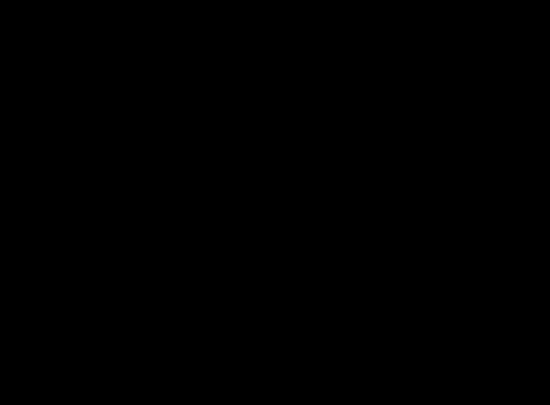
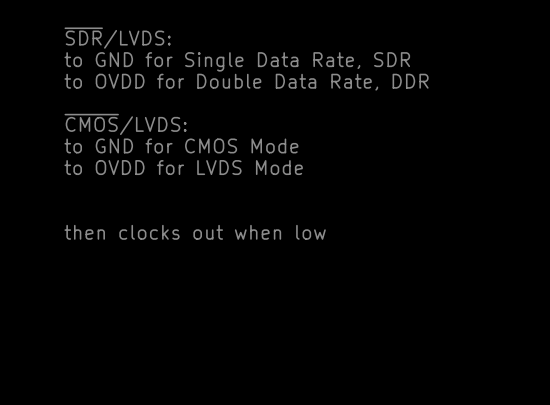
text: none -> ~{SDR}/LVDS: (117, 38)
text: none -> to GND for Single Data Rate, SDR (237, 61)
text: none -> to OVDD for Double Data Rate, DDR (246, 82)
text: none -> ~{CMOS}/LVDS: (125, 124)
text: none -> to GND for CMOS Mode (181, 145)
text: none -> to OVDD for LVDS Mode (183, 167)
text: none -> then clocks out when low (195, 232)

